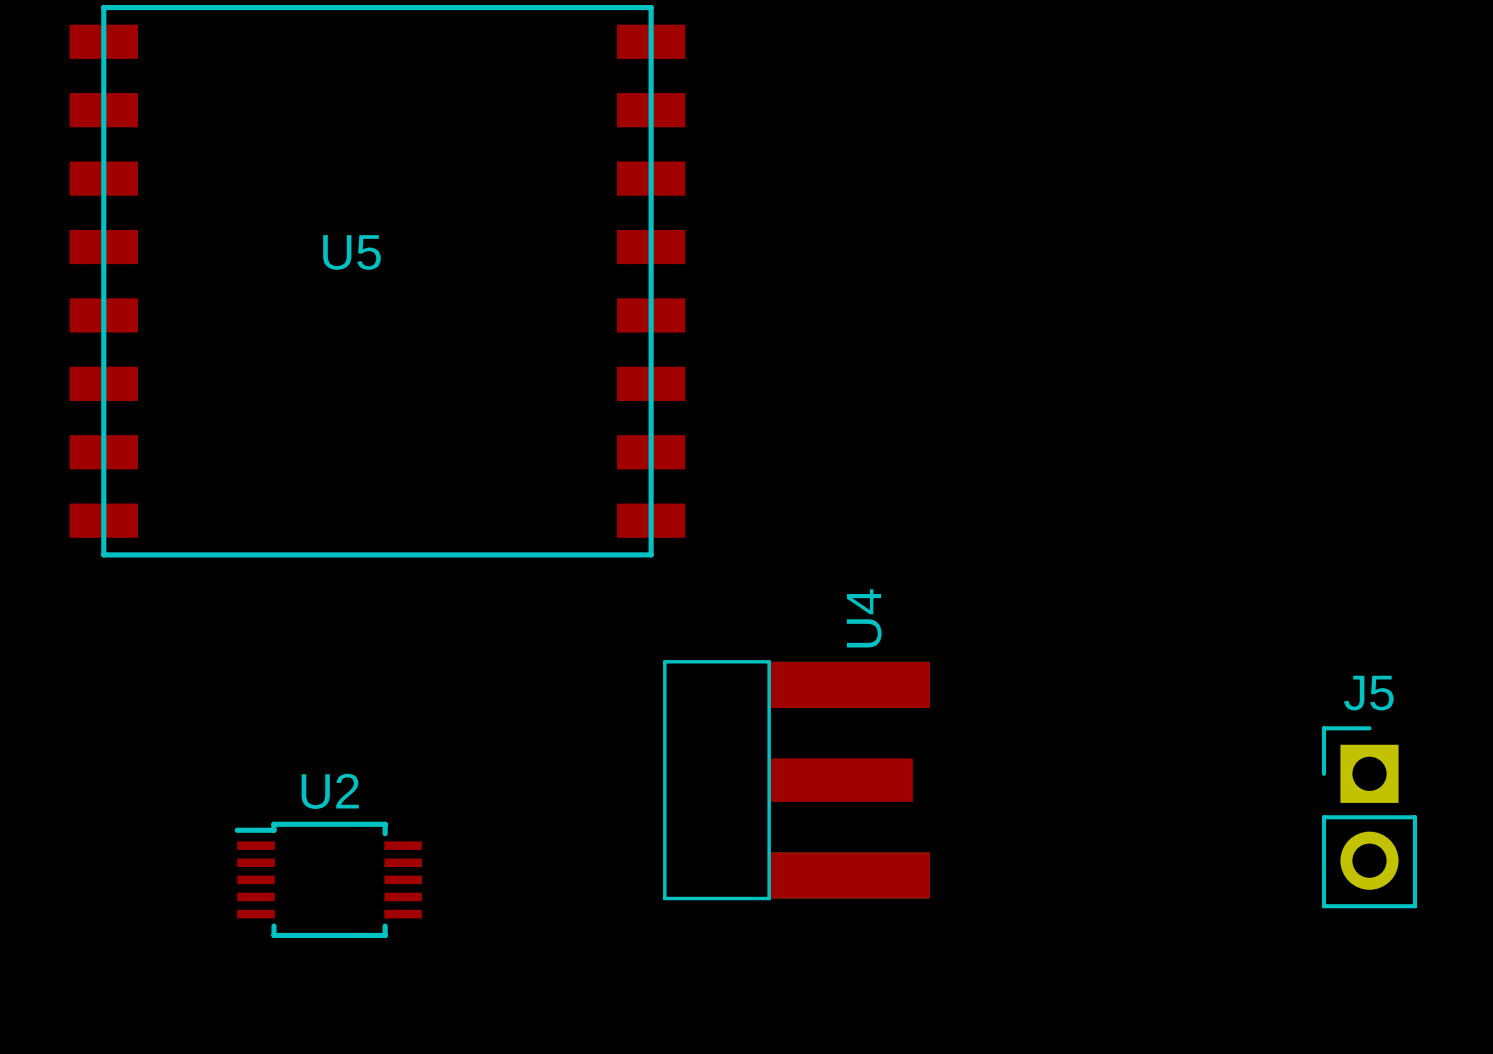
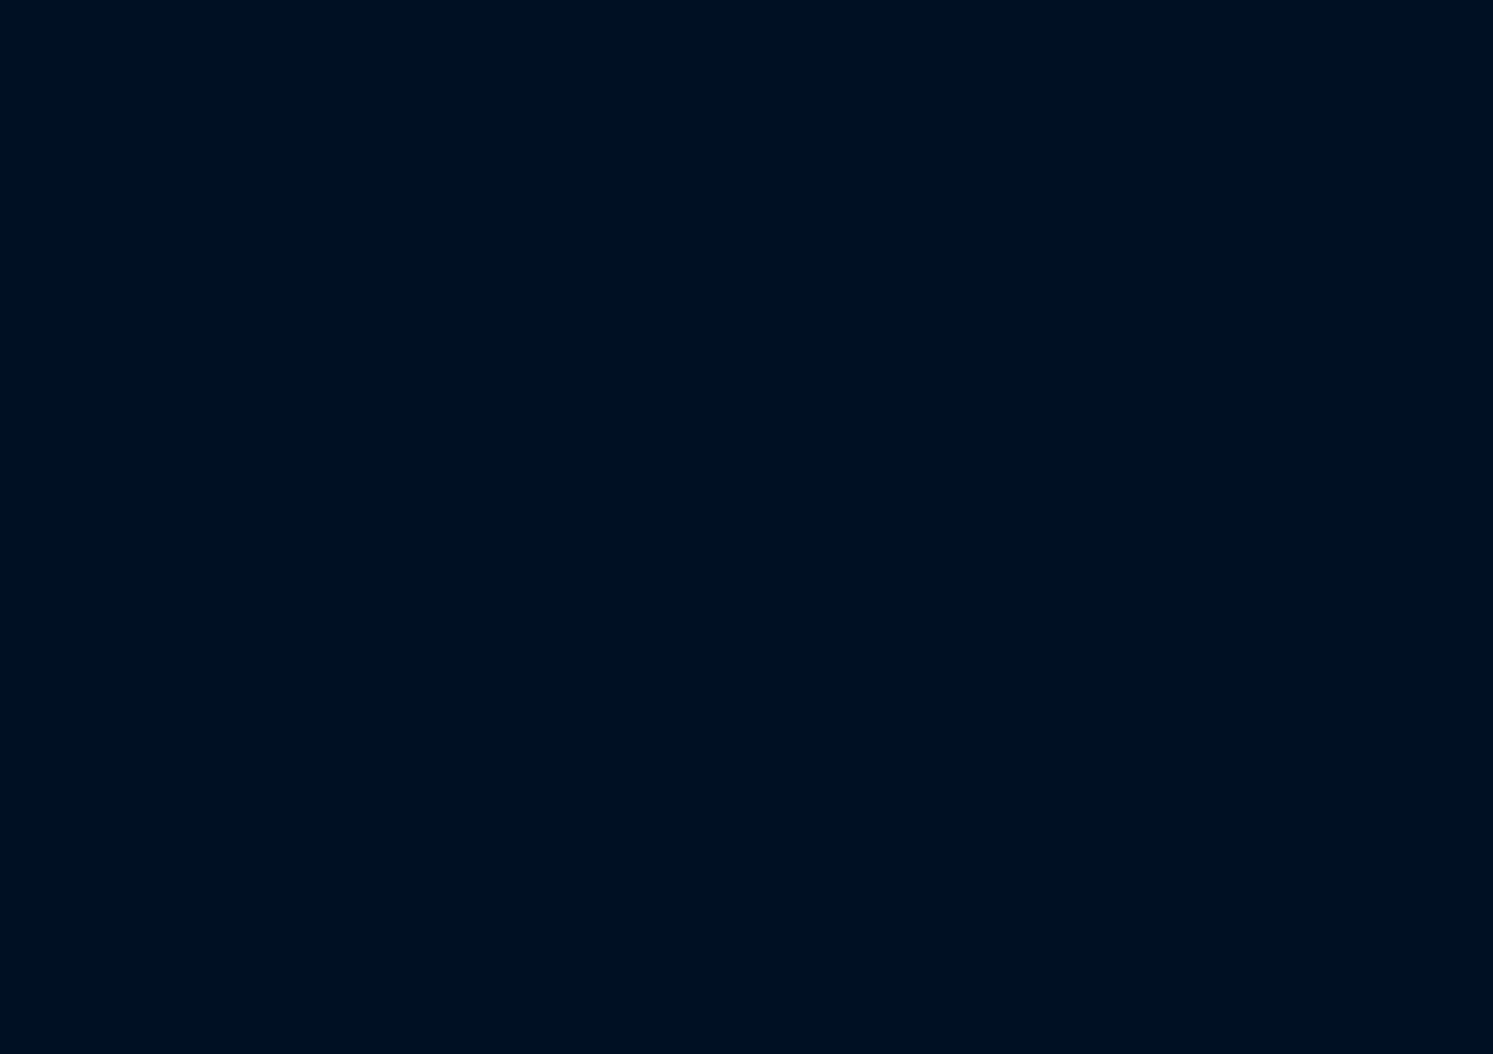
U5: (377, 281) -> none
U4: (796, 780) -> none
J5: (1369, 817) -> none
U2: (328, 879) -> none

